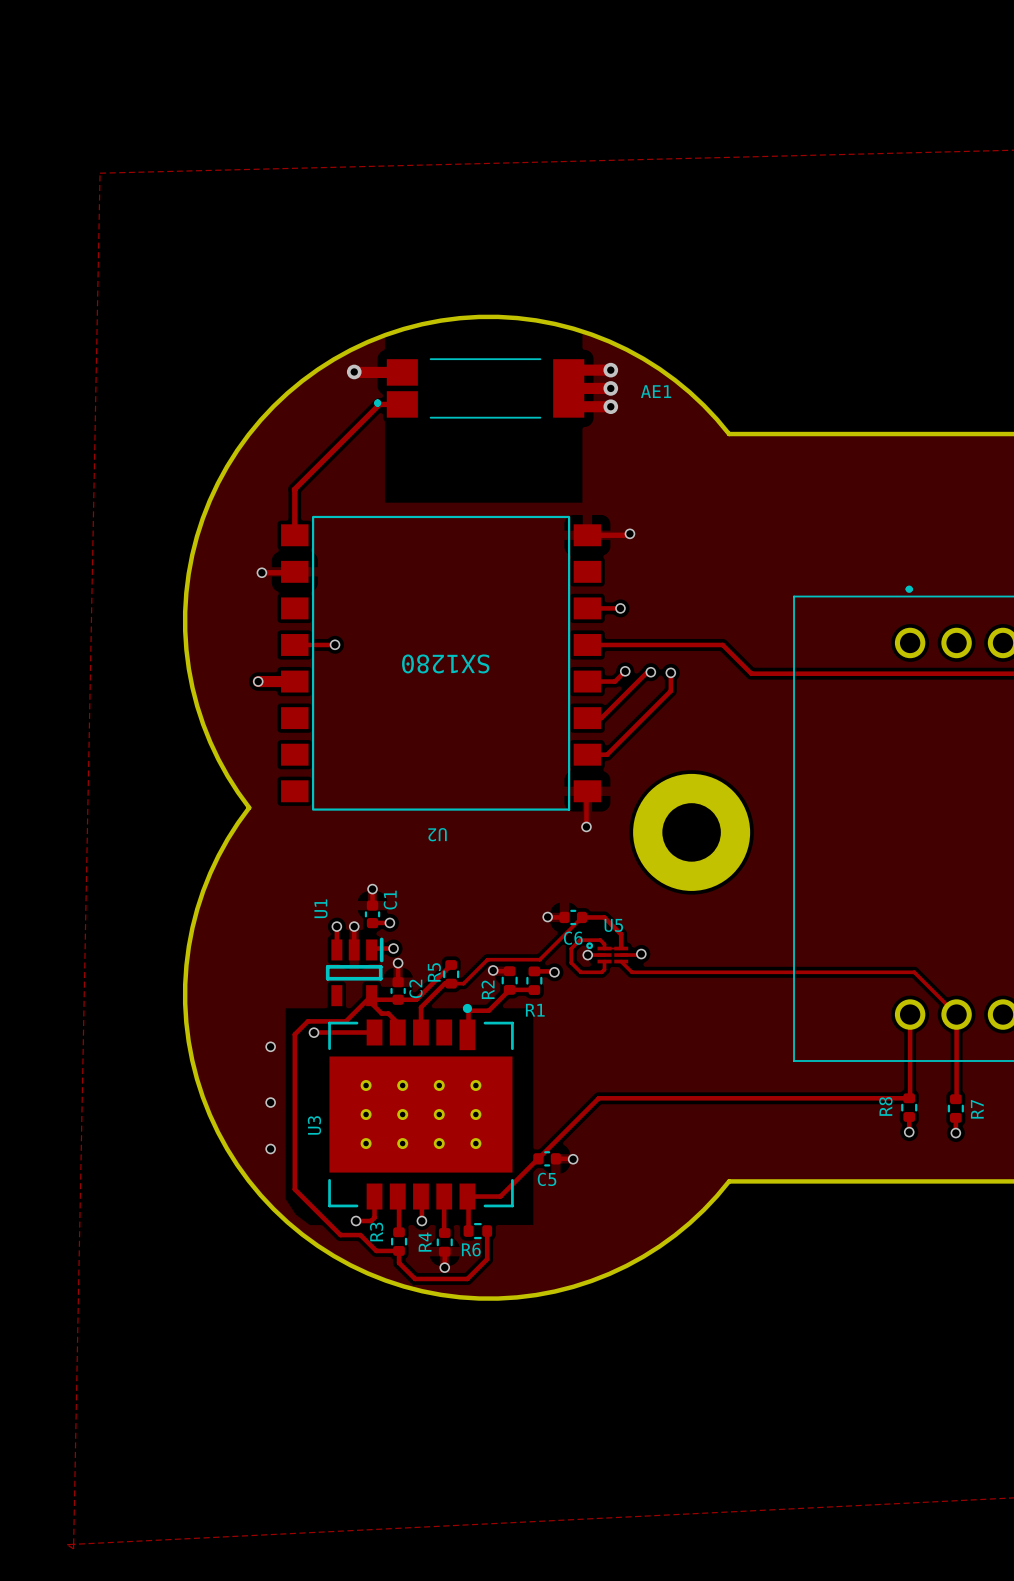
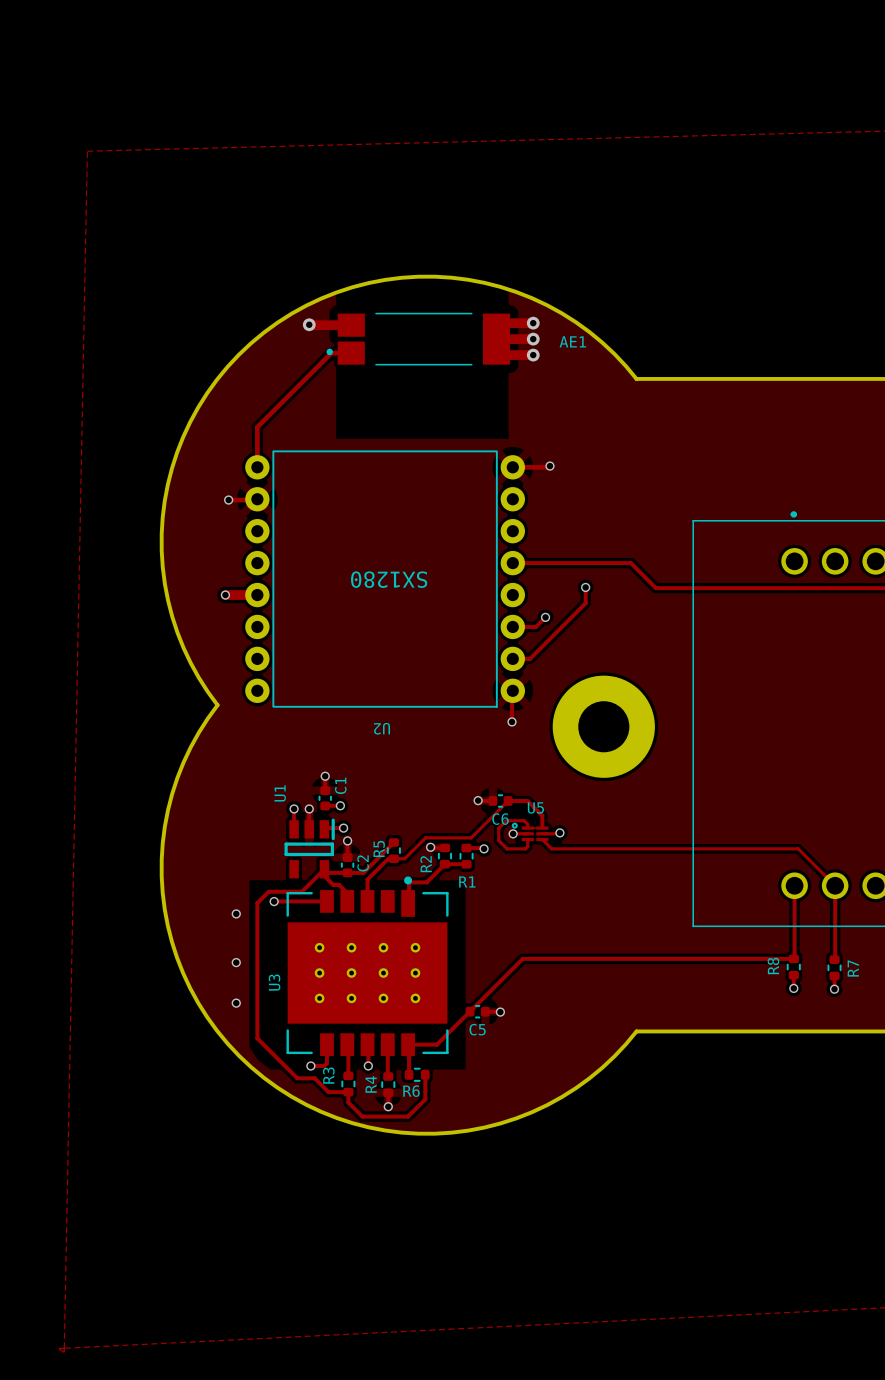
U2 footprint: [281, 515, 602, 811] -> [245, 450, 525, 708]
track: (587, 608) (620, 608) -> none
via: (620, 608) -> none
track: (294, 644) (334, 644) -> none
via: (335, 644) -> none
track: (625, 671) (614, 681) (587, 681) -> none
via: (625, 671) -> none
track: (650, 672) (647, 672) (601, 718) -> (545, 617) (535, 626) (525, 626)
via: (650, 672) -> none
via: none -> (545, 617)

